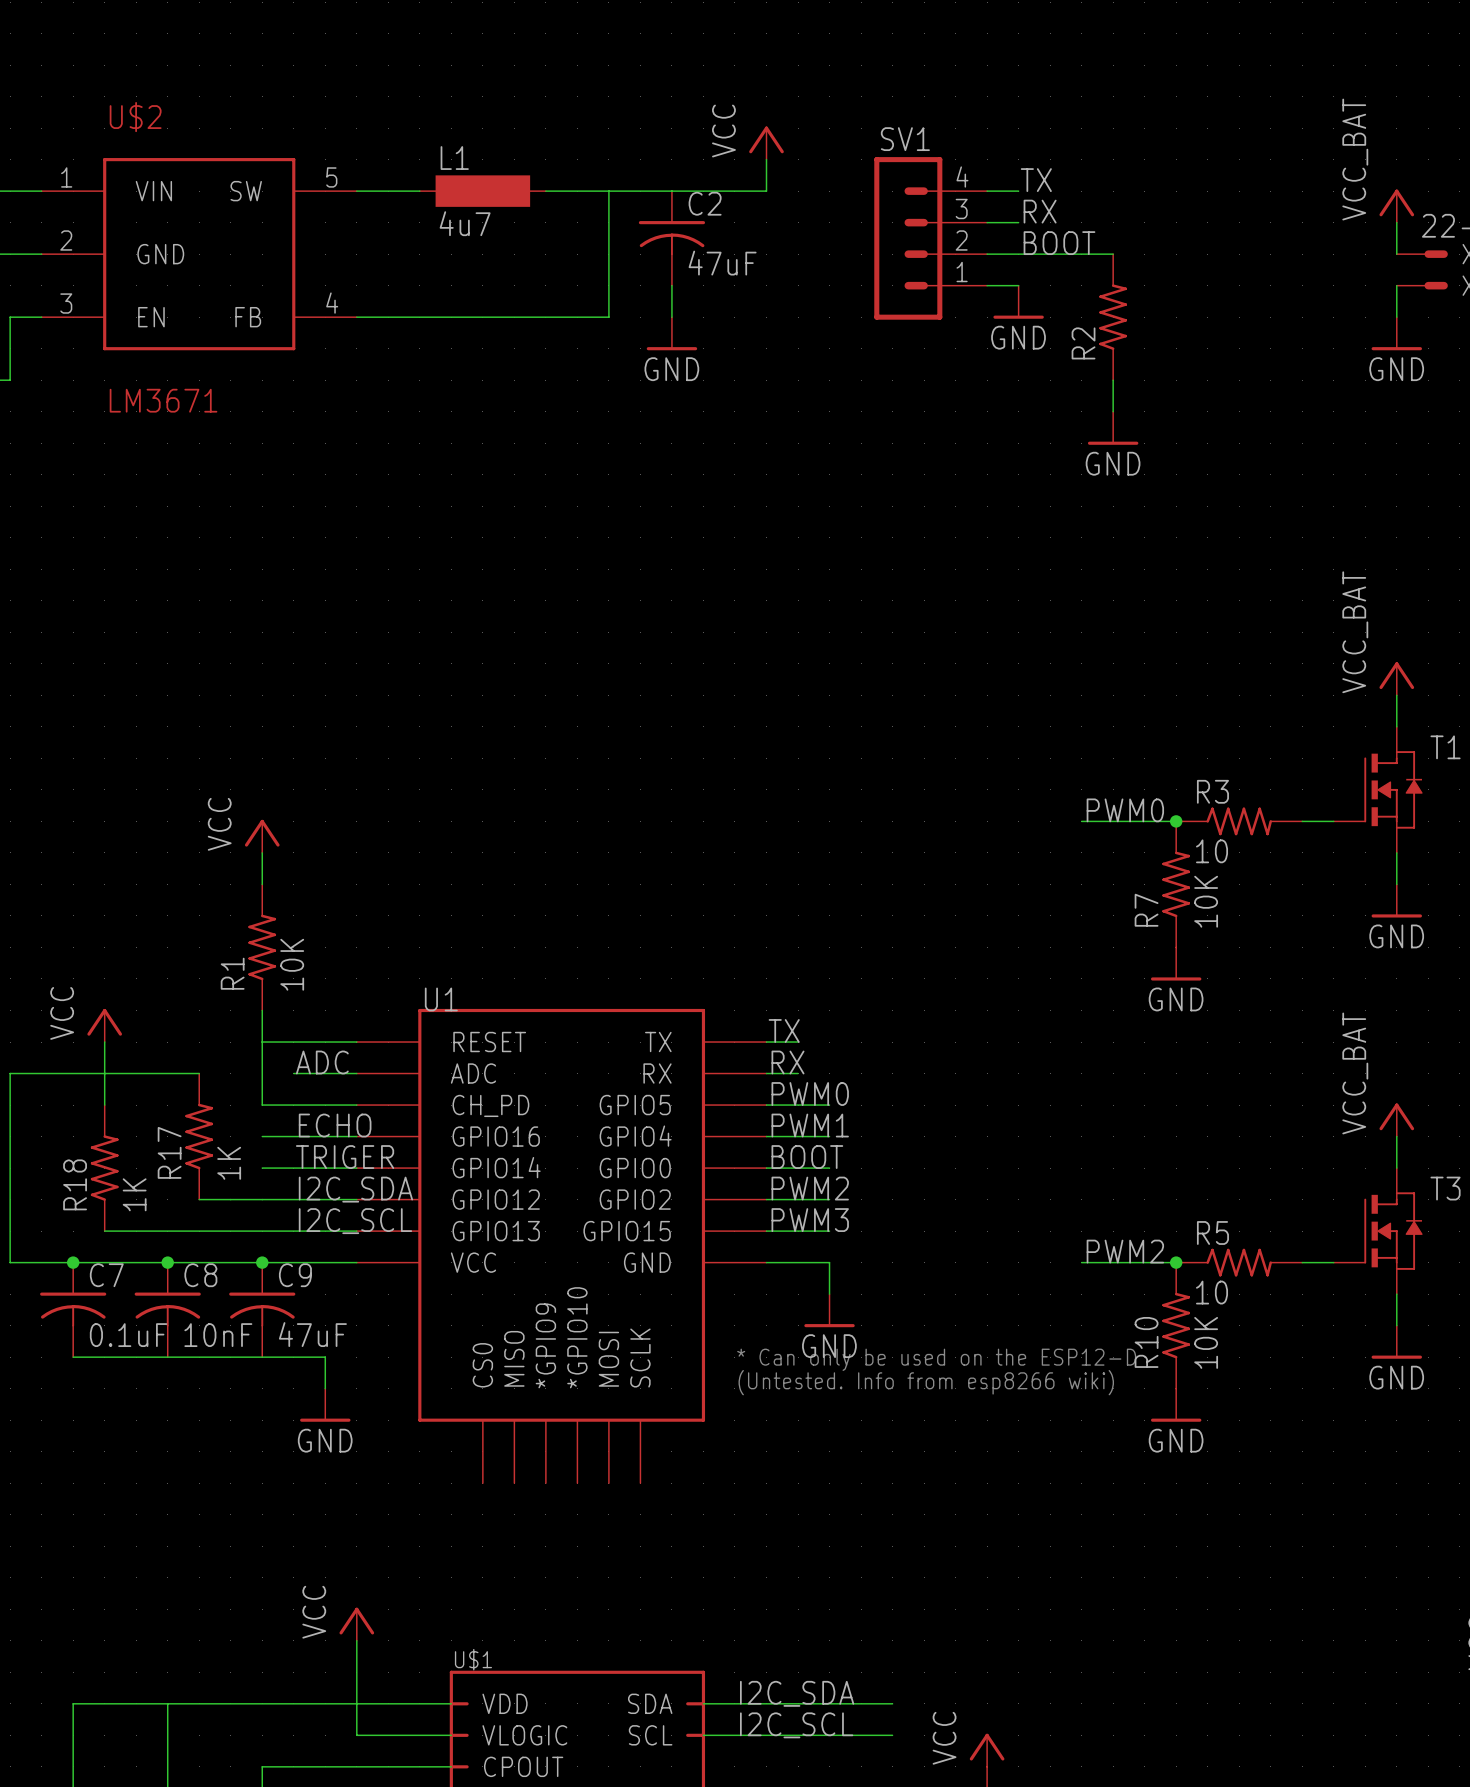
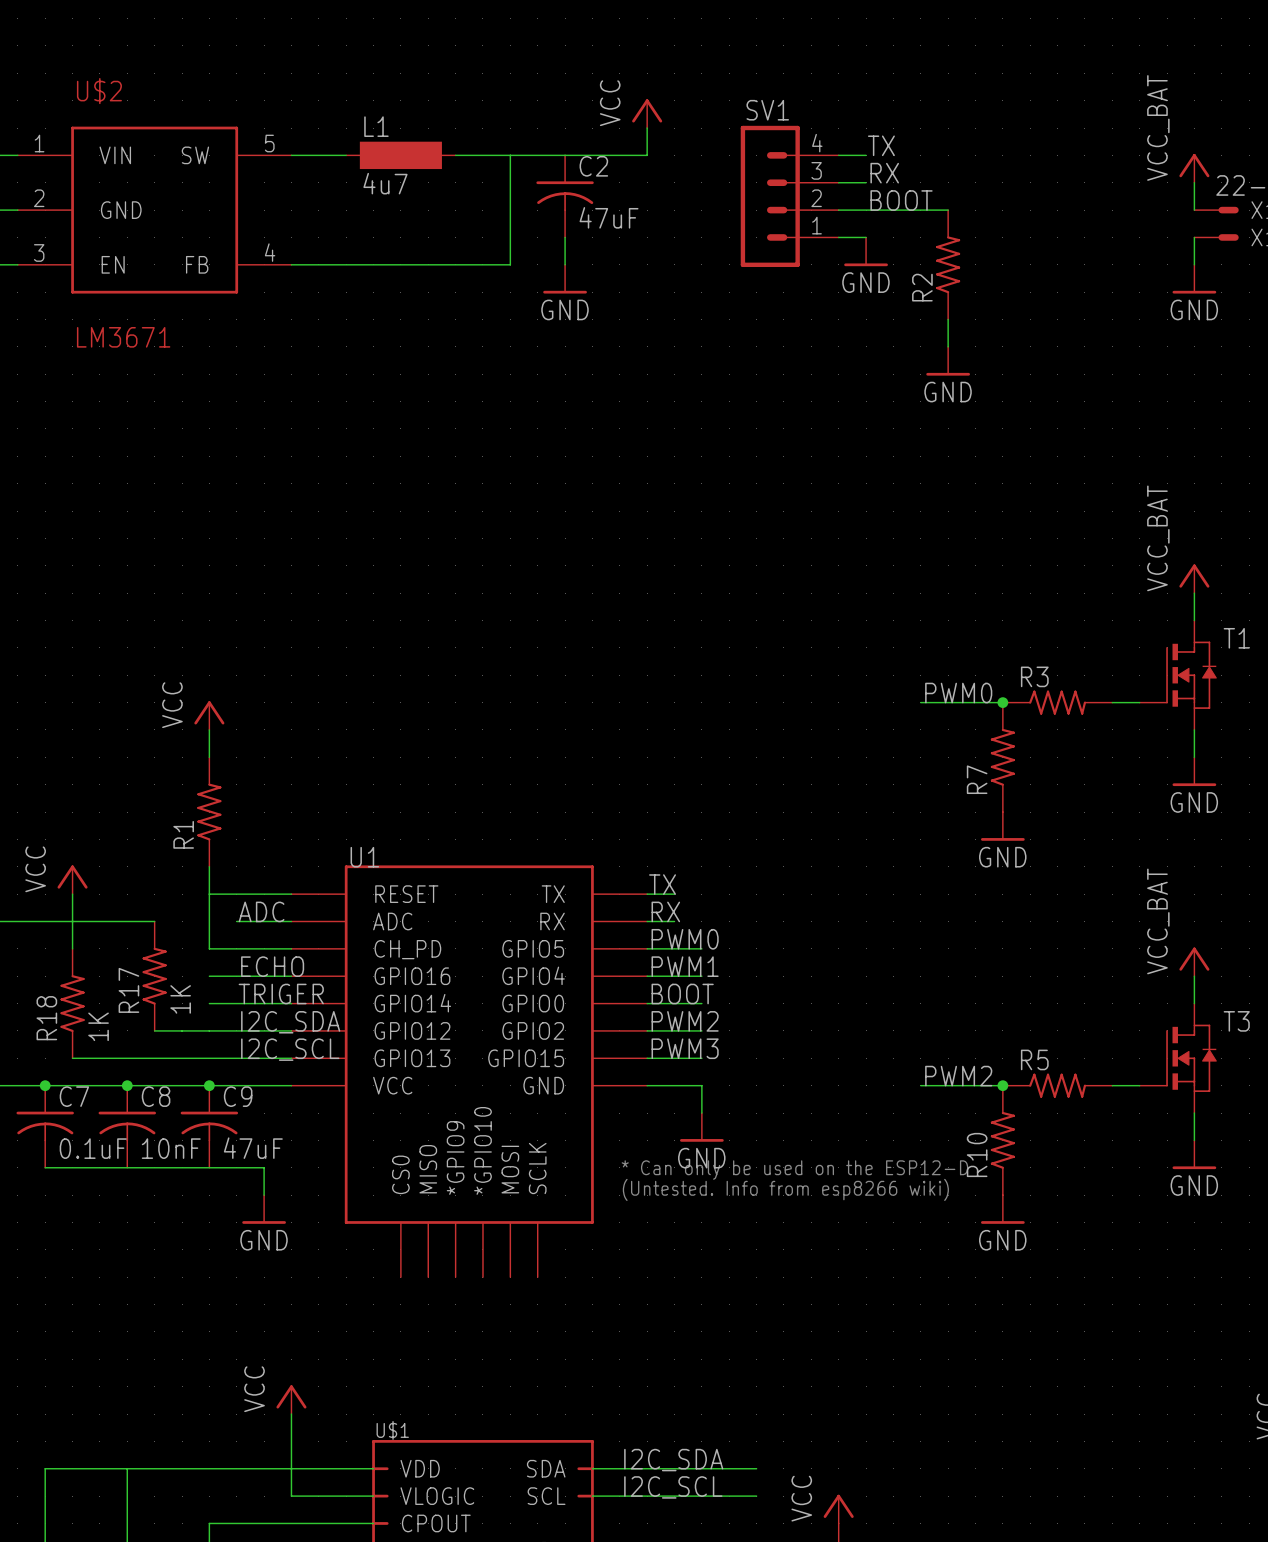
R3 value: 10 (1212, 851) -> none
R7 value: 10K (1206, 901) -> none
R1 value: 10K (292, 964) -> none
R5 value: 10 (1212, 1292) -> none
R10 value: 10K (1206, 1342) -> none

